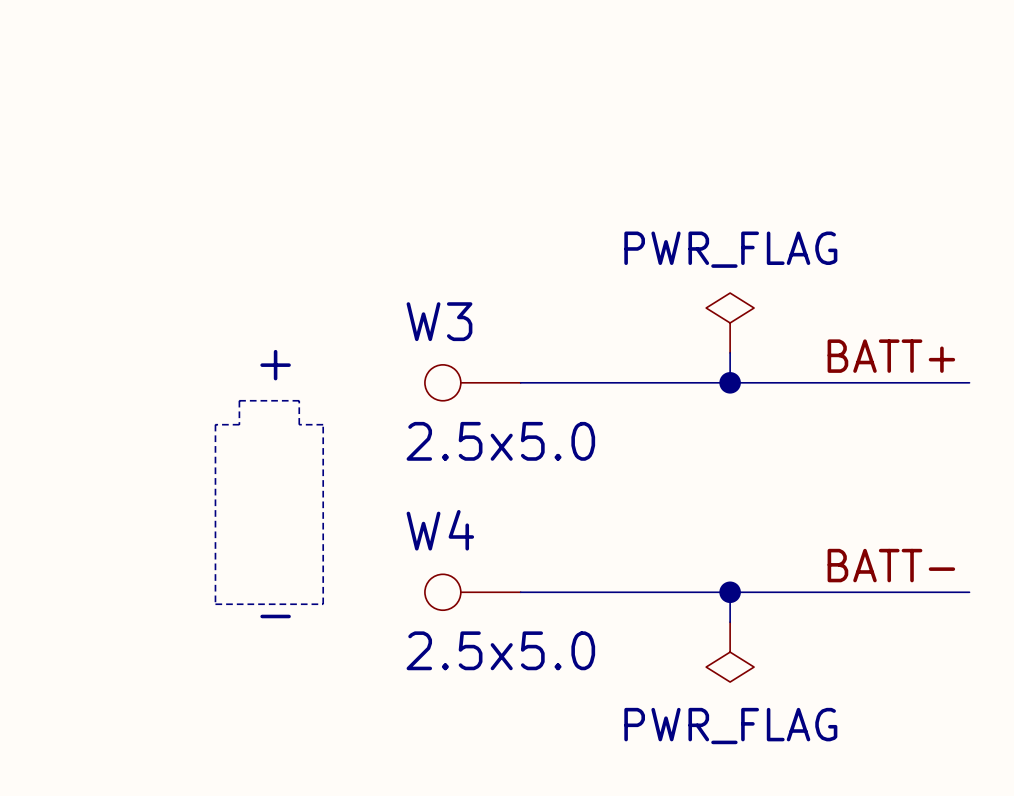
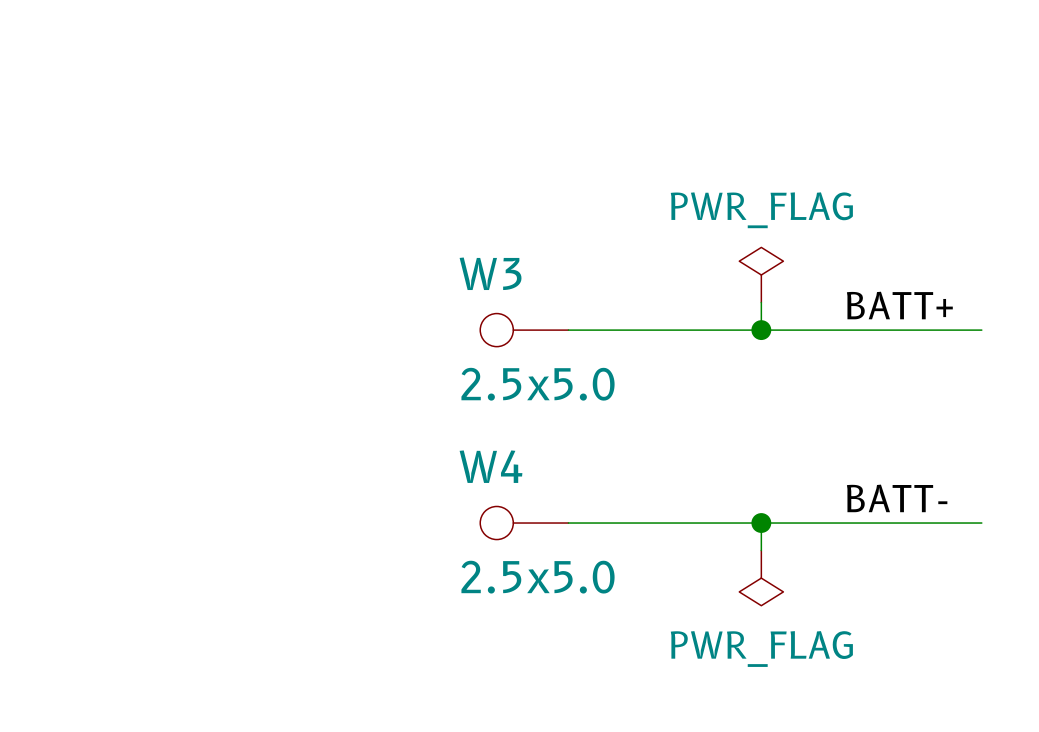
text: + (275, 365) -> none
line: (239, 400) (299, 400) (299, 424) (323, 424) (323, 604) (215, 604) (215, 424) (239, 424) (239, 400) -> none
text: - (275, 616) -> none

